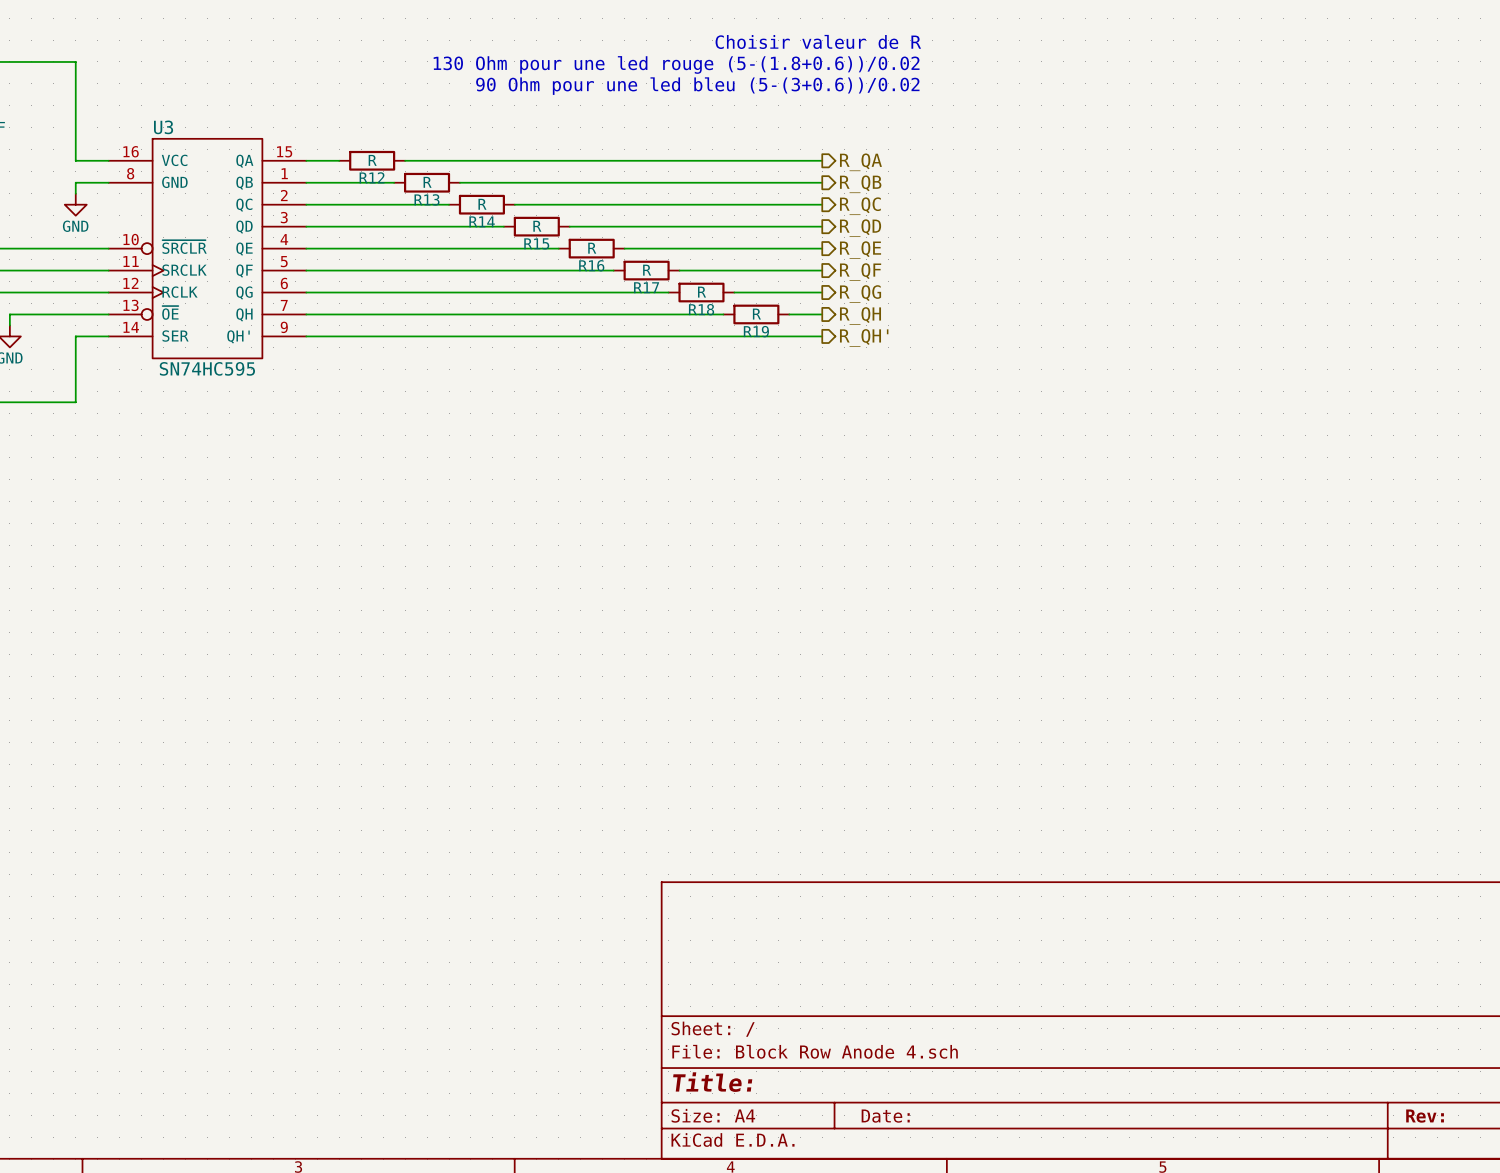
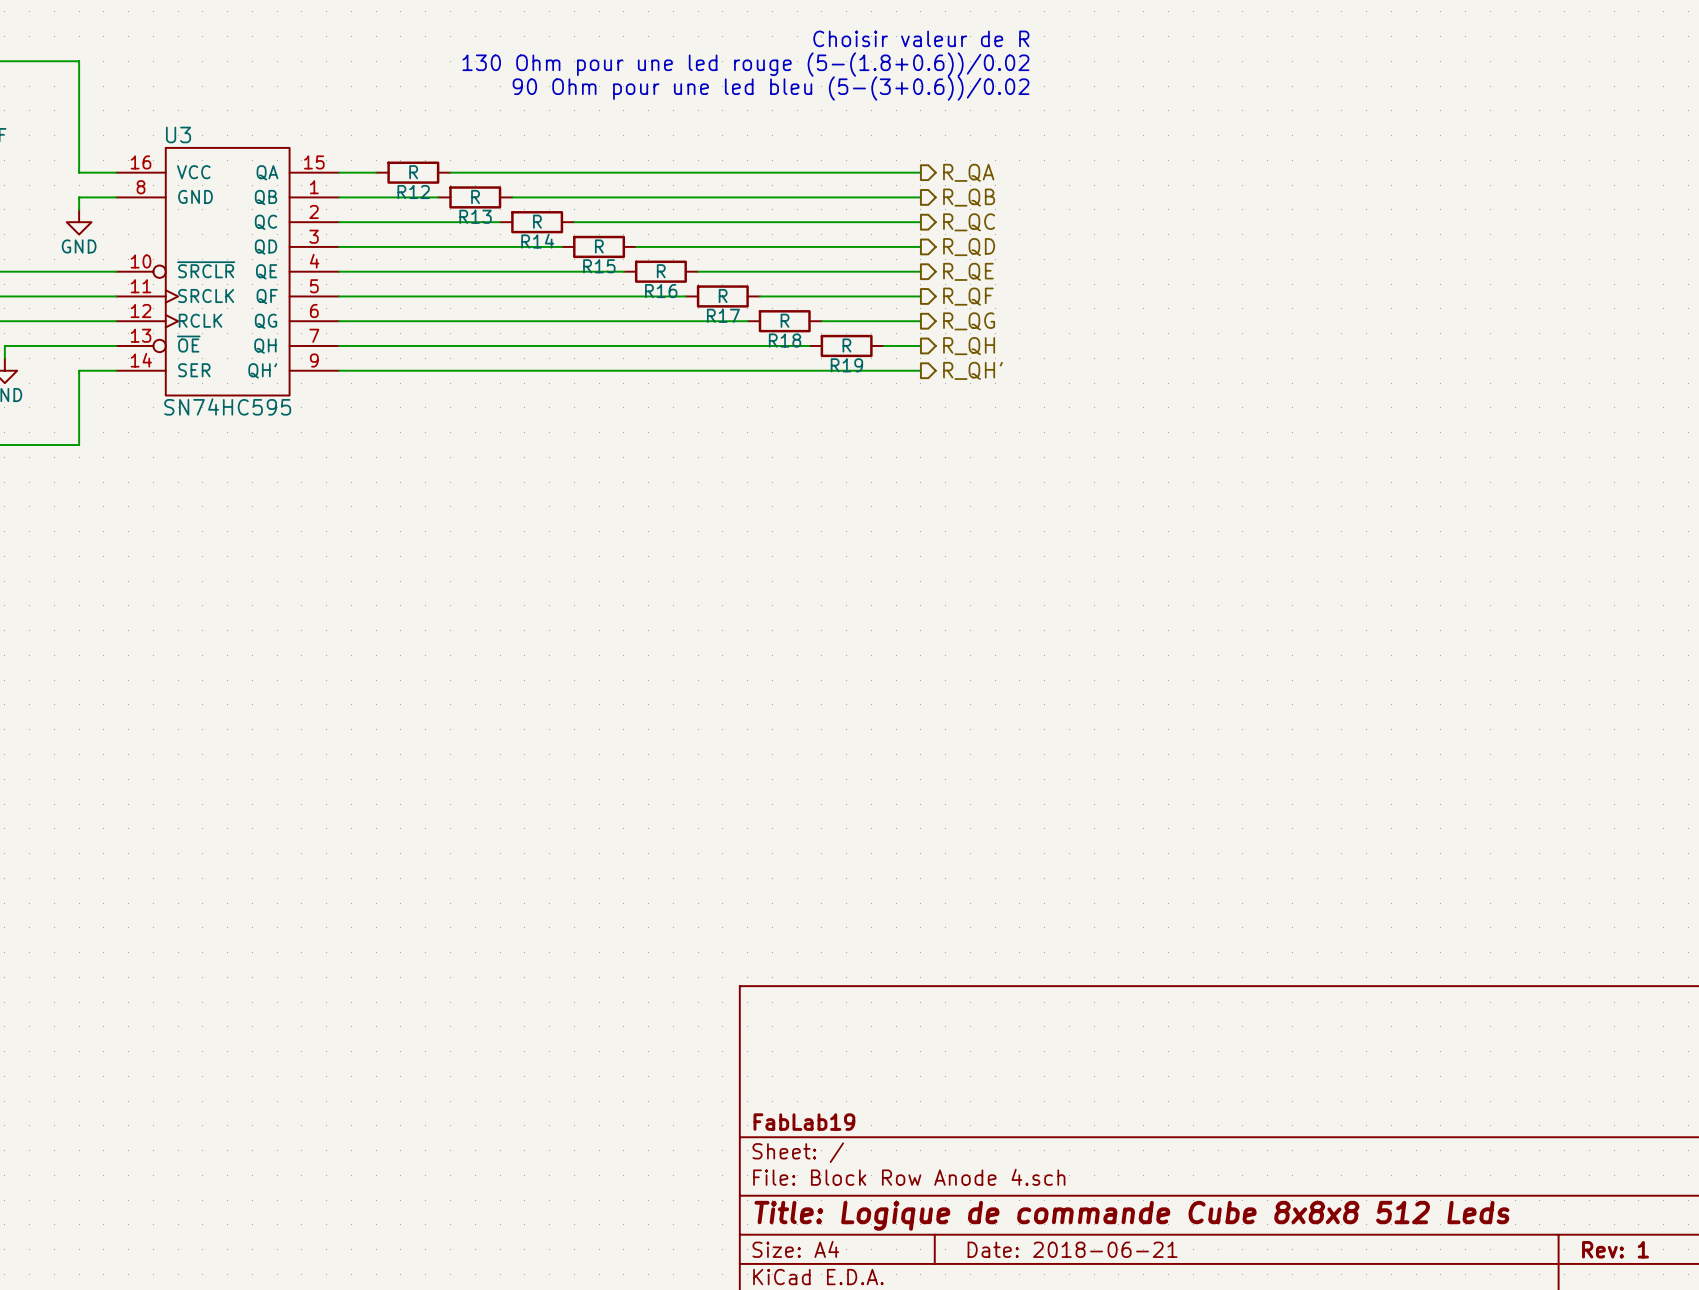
title block: none -> FabLab19 (804, 1122)
title block: Title: (712, 1082) -> Title: Logique de commande Cube 8x8x8 512 Leds (1131, 1215)
title block: Date: (885, 1116) -> Date: 2018-06-21 (1072, 1249)
title block: Rev: (1425, 1116) -> Rev: 1 (1615, 1249)

